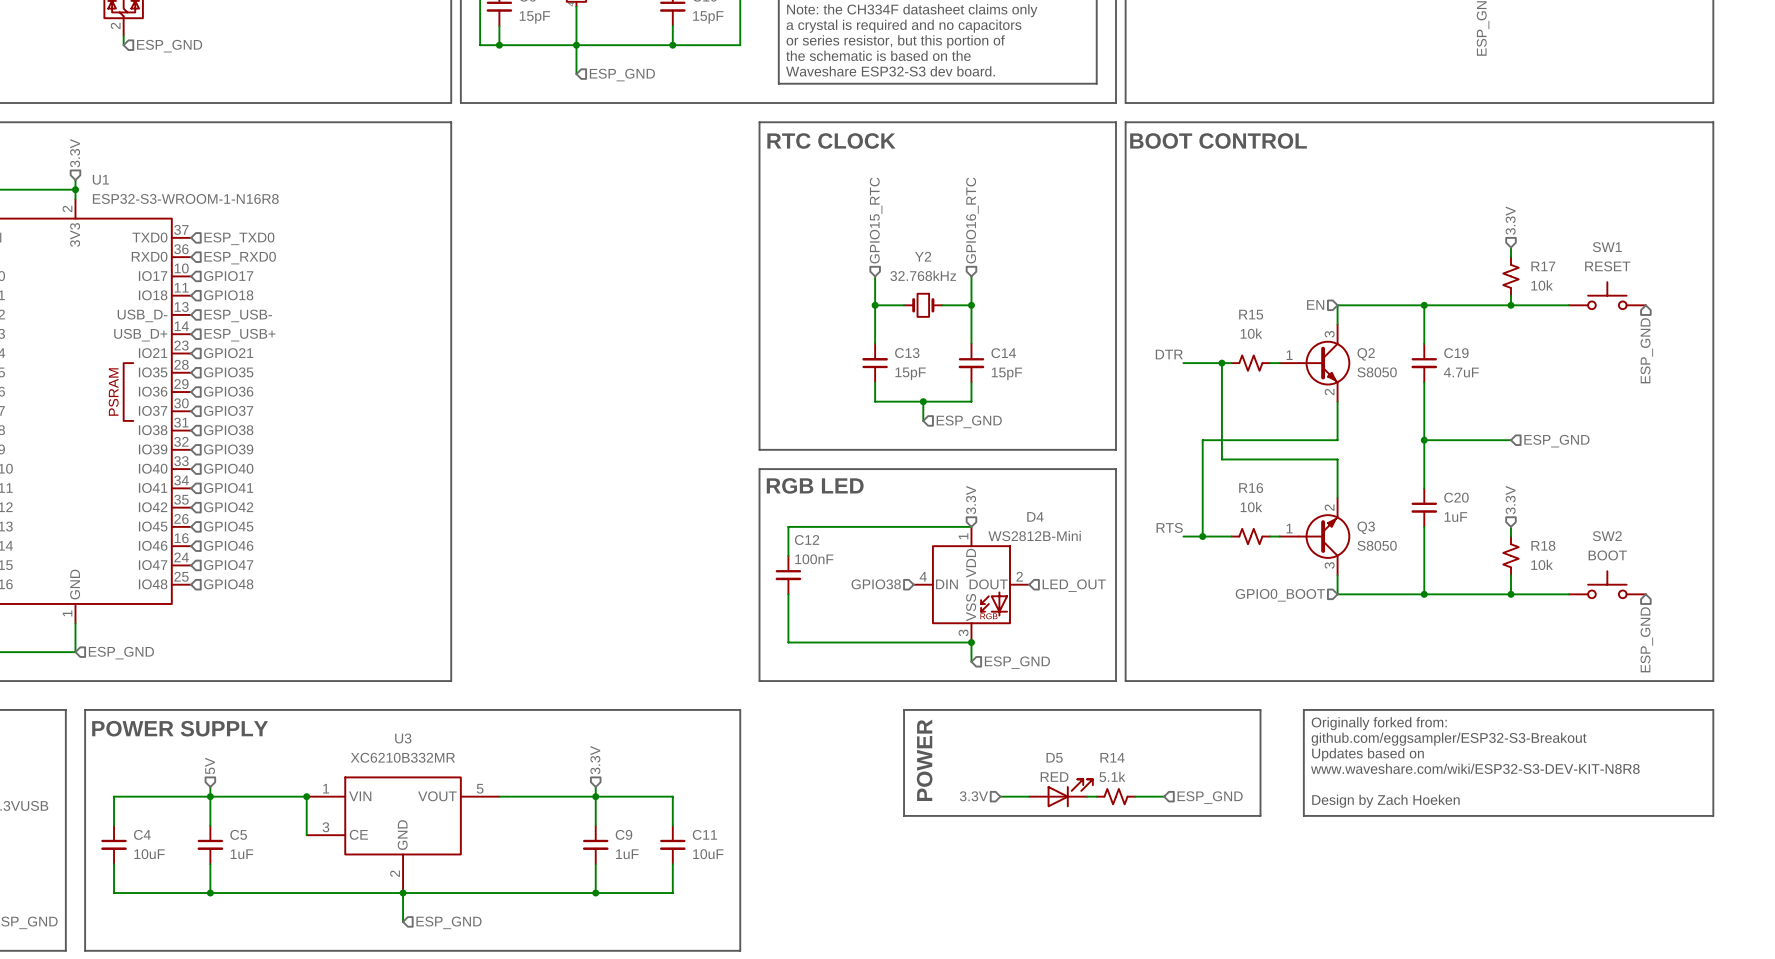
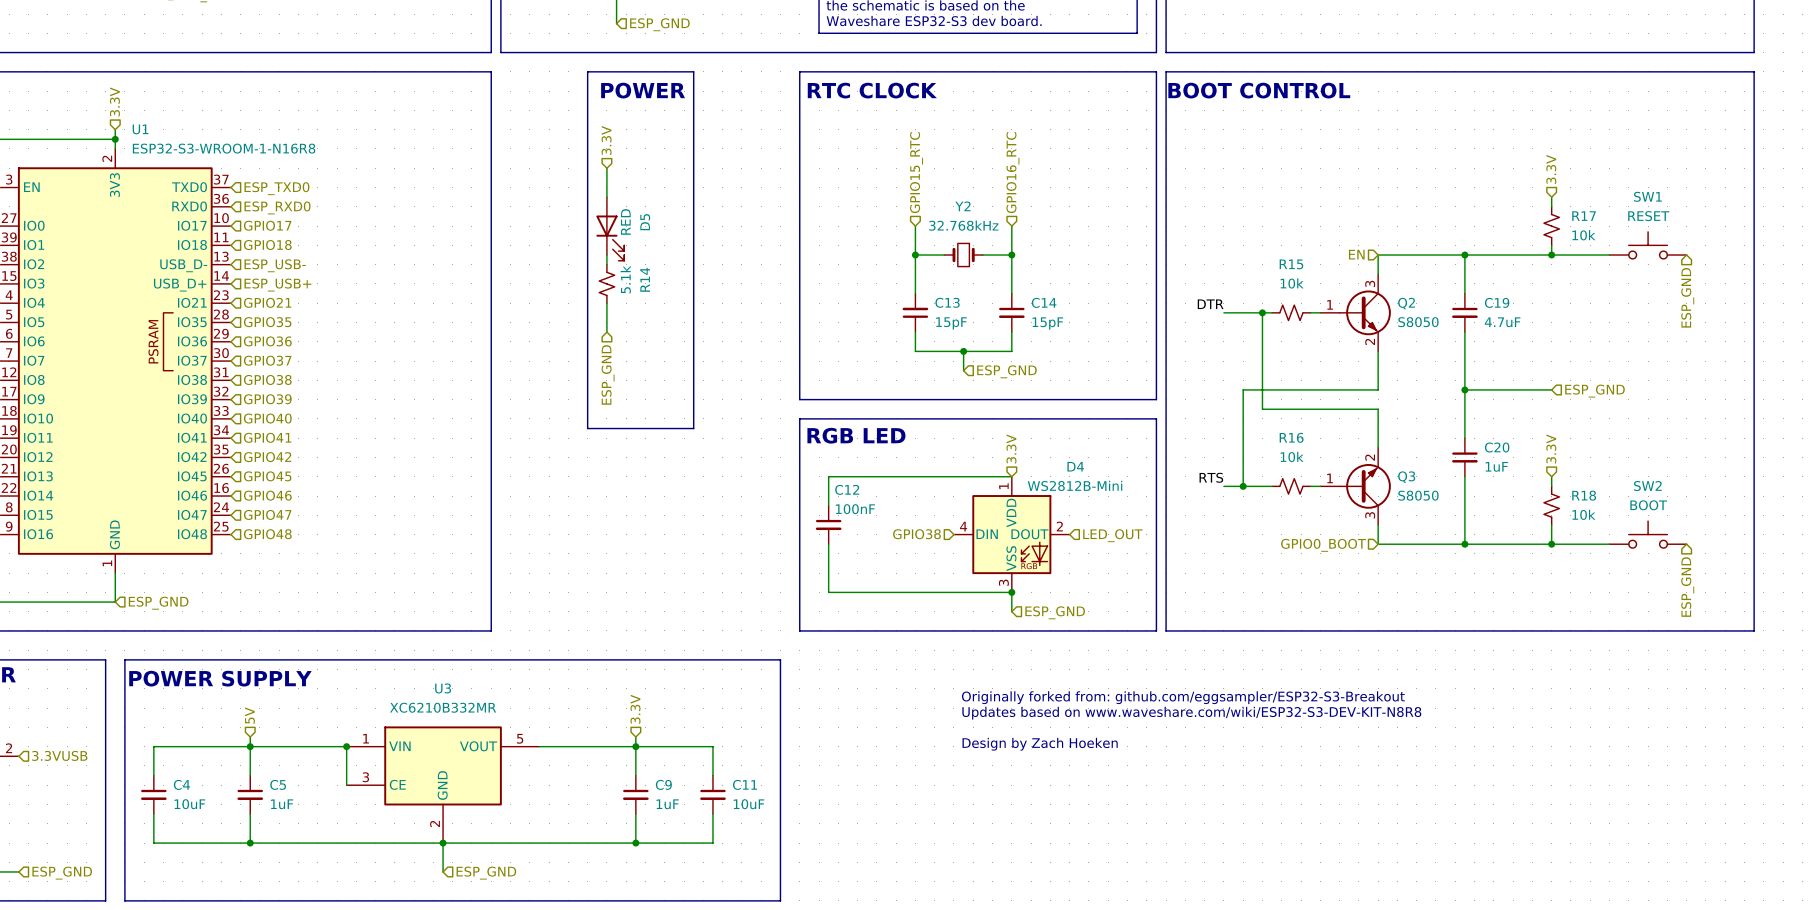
line: none -> (587, 71) (693, 71) (693, 428) (587, 428) (587, 71)
text: none -> POWER (643, 90)
hierarchical label: none -> 3.3V (606, 140)
wire: none -> (606, 168) (606, 197)
wire: none -> (606, 255) (606, 264)
wire: none -> (606, 303) (606, 332)
hierarchical label: none -> ESP_GND (608, 374)
line: (904, 709) (1260, 709) (1260, 815) (904, 815) (904, 709) -> none
line: (1303, 709) (1713, 709) (1713, 815) (1303, 815) (1303, 709) -> none
text: Originally forked from: (1379, 723) -> none
text: github.com/eggsampler/ESP32-S3-Breakout (1449, 739) -> none
text: none -> Originally forked from: github.com/eggsampler/ESP32-S3-Breakout (1183, 697)
text: Updates based on (1368, 754) -> none
text: POWER (924, 760) -> none
text: none -> Updates based on www.waveshare.com/wiki/ESP32-S3-DEV-KIT-N8R8 (1191, 713)
text: www.waveshare.com/wiki/ESP32-S3-DEV-KIT-N8R8 (1475, 768) -> none
D5 position: (1061, 793) -> (610, 228)
D5 rotation: 0° (1070, 793) -> 90° clockwise (610, 238)
text: none -> Design by Zach Hoeken (1040, 744)
hierarchical label: 3.3V (973, 796) -> none
wire: (1000, 796) (1029, 796) -> none
wire: (1087, 796) (1096, 796) -> none
R14 rotation: 0° (1115, 796) -> 90° clockwise (606, 283)
R14 position: (1115, 796) -> (606, 283)
wire: (1135, 796) (1164, 796) -> none
hierarchical label: ESP_GND (1210, 797) -> none
text: Design by Zach Hoeken (1385, 801) -> none

